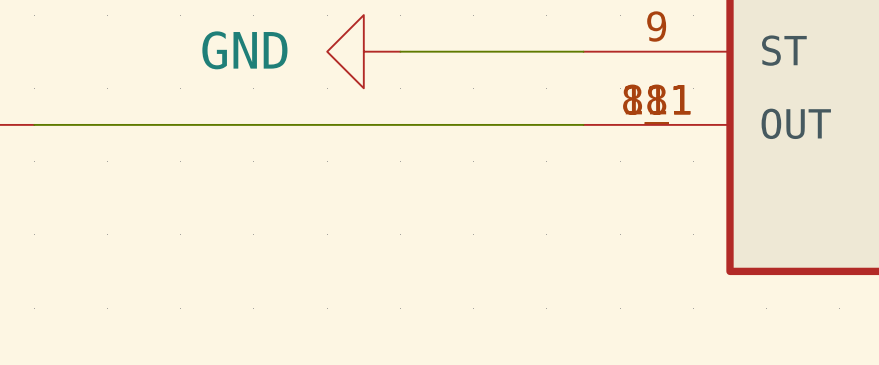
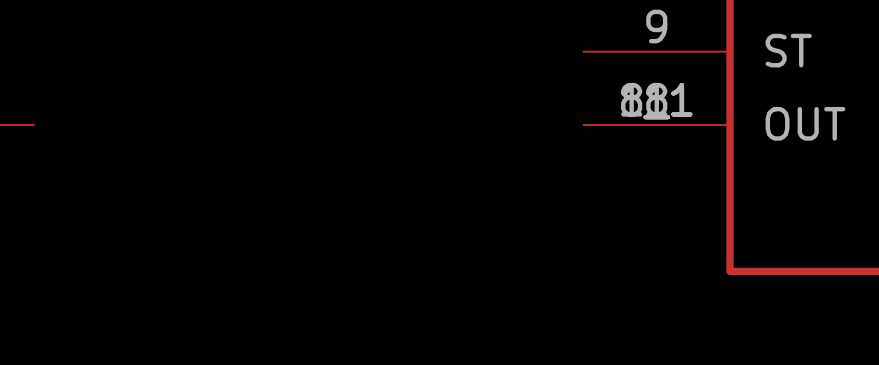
power symbol: GND (363, 51) -> none
wire: (400, 51) (583, 51) -> none
wire: (34, 124) (583, 124) -> none

